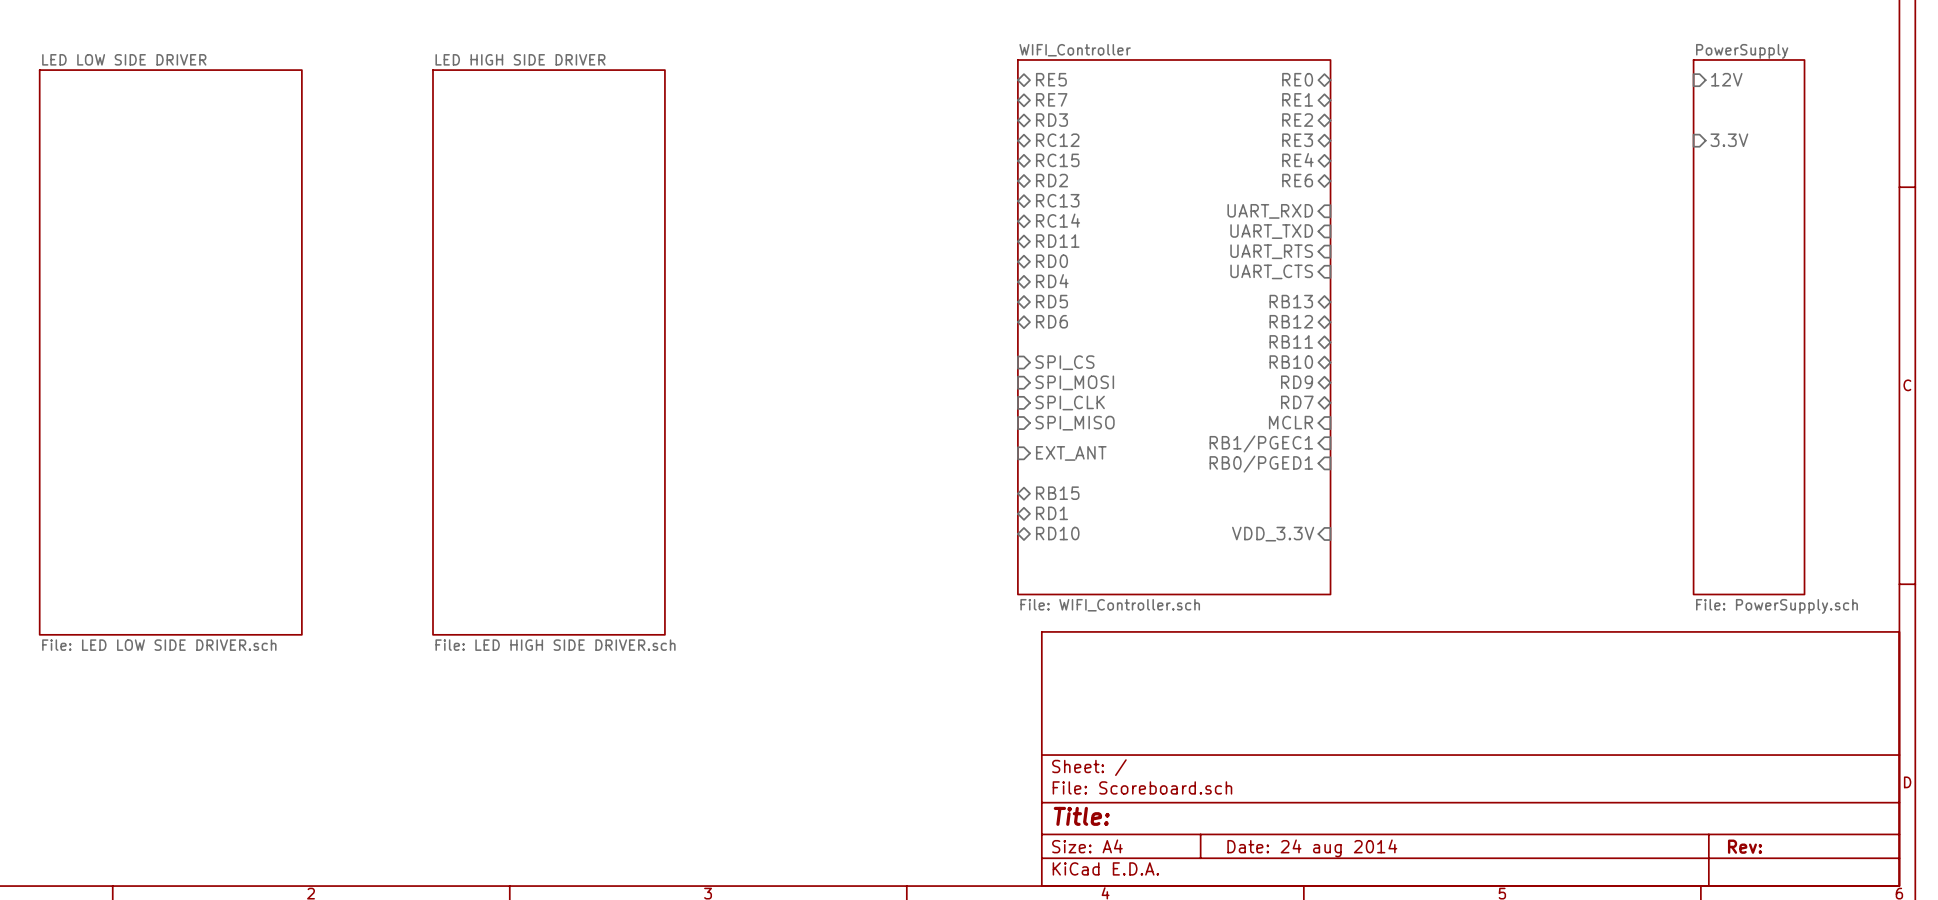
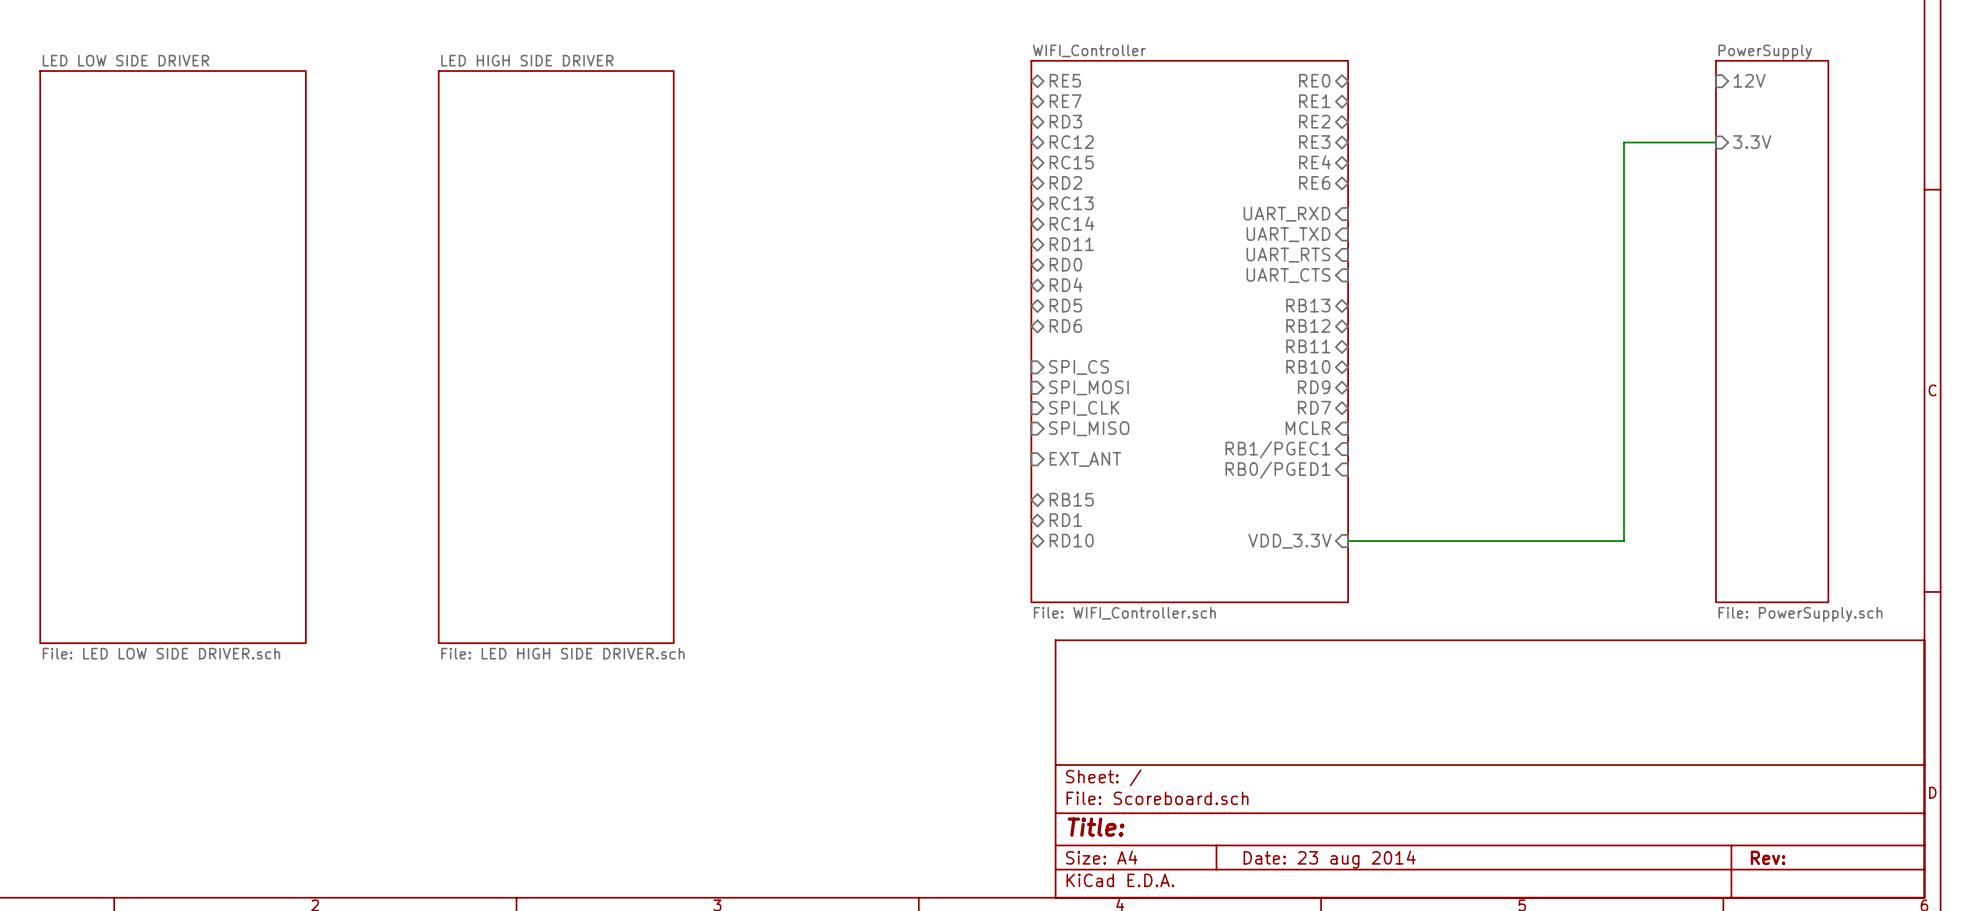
wire: none -> (1715, 142) (1623, 142) (1623, 541) (1348, 541)
title block: Date: 24 aug 2014 (1312, 848) -> Date: 23 aug 2014 (1329, 859)

